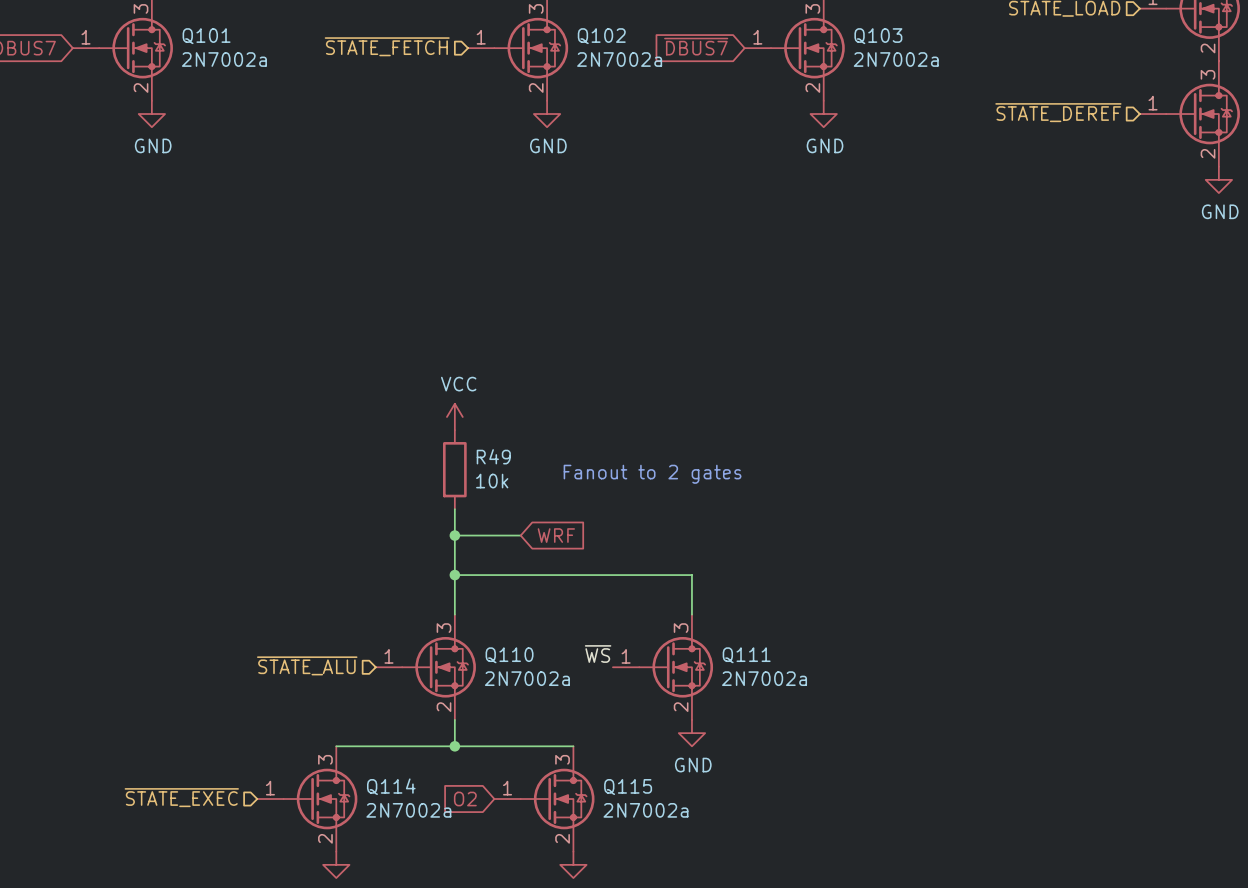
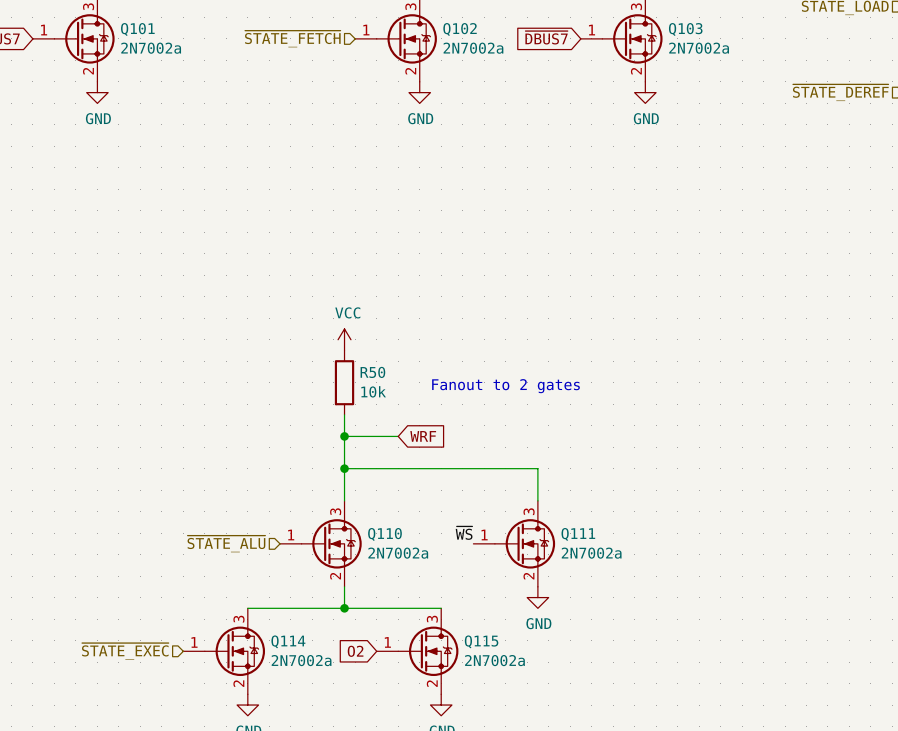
R49 name: R49 (493, 456) -> R50 (372, 372)

